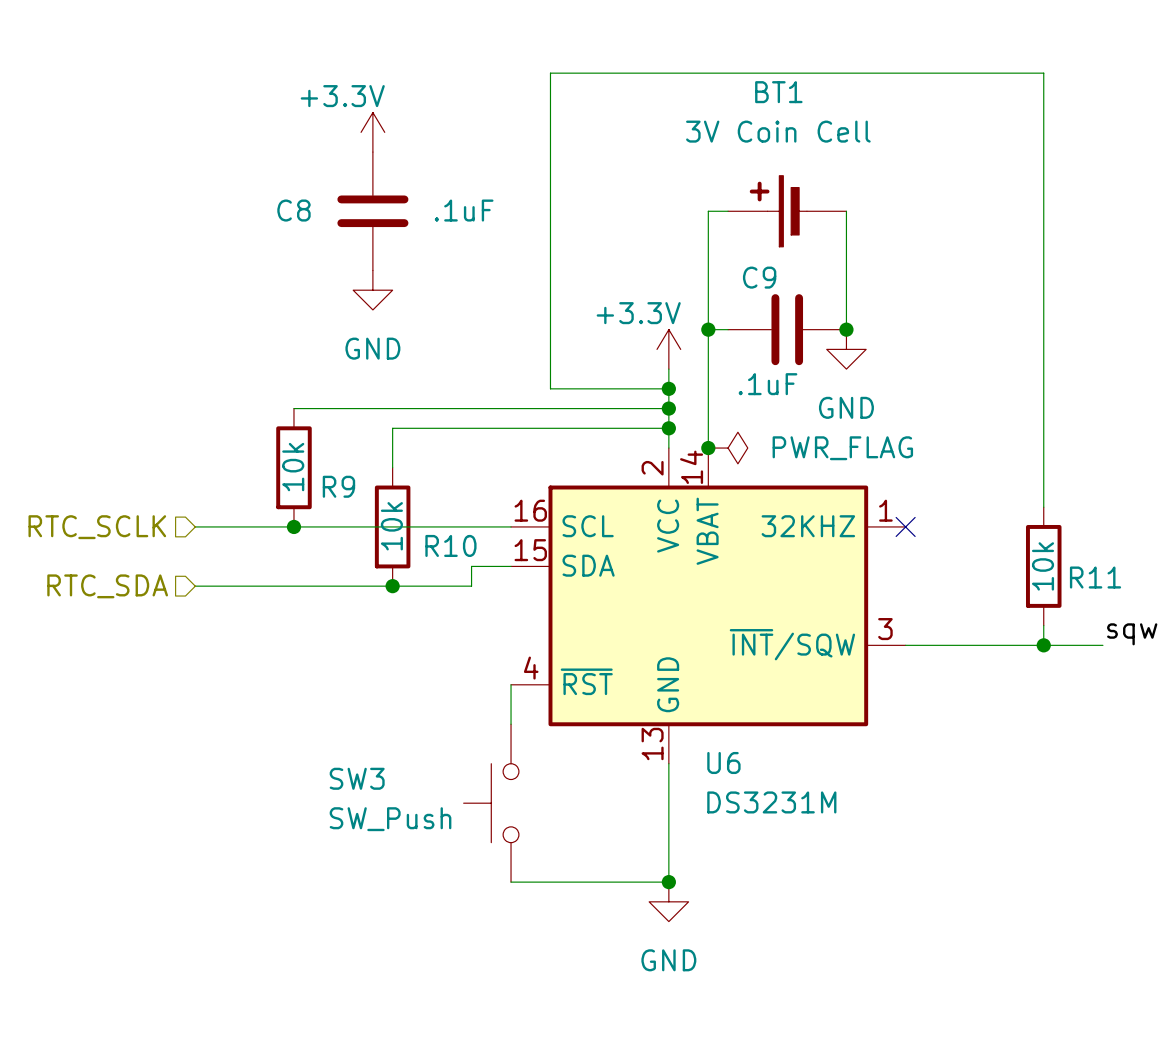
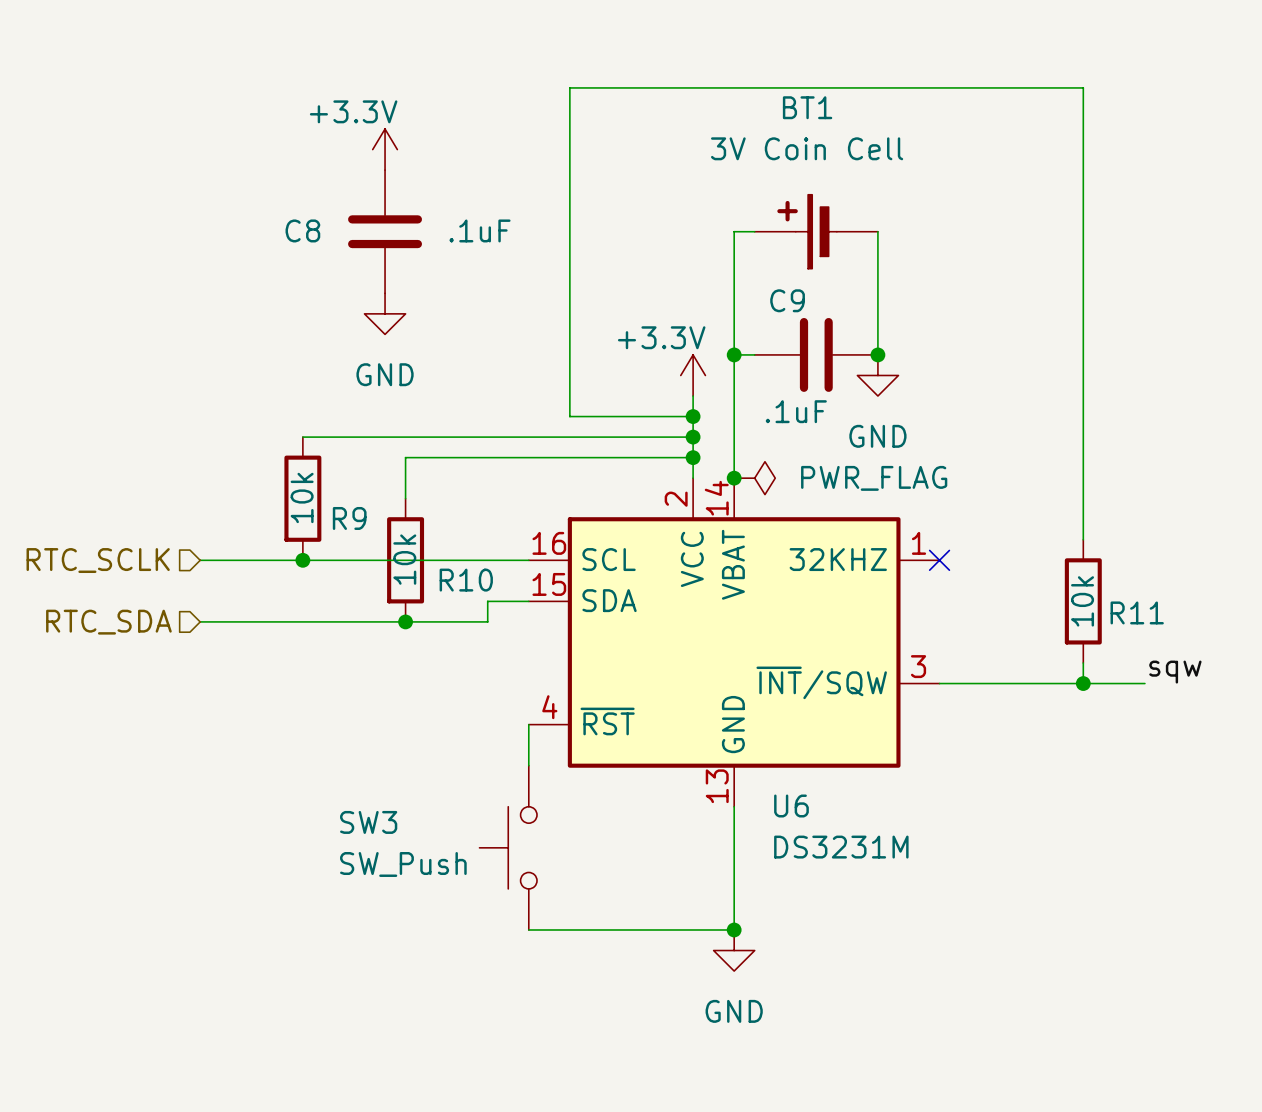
U6 symbol: [511, 448, 906, 764] -> [528, 478, 940, 807]
U6 name position: U6 (723, 762) -> U6 (791, 806)
wire: (668, 763) (668, 882) -> (734, 806) (734, 929) (693, 929)
U6 value position: DS3231M (771, 802) -> DS3231M (841, 847)
junction position: (668, 882) -> (734, 929)
power symbol position: GND (668, 901) -> GND (734, 950)

